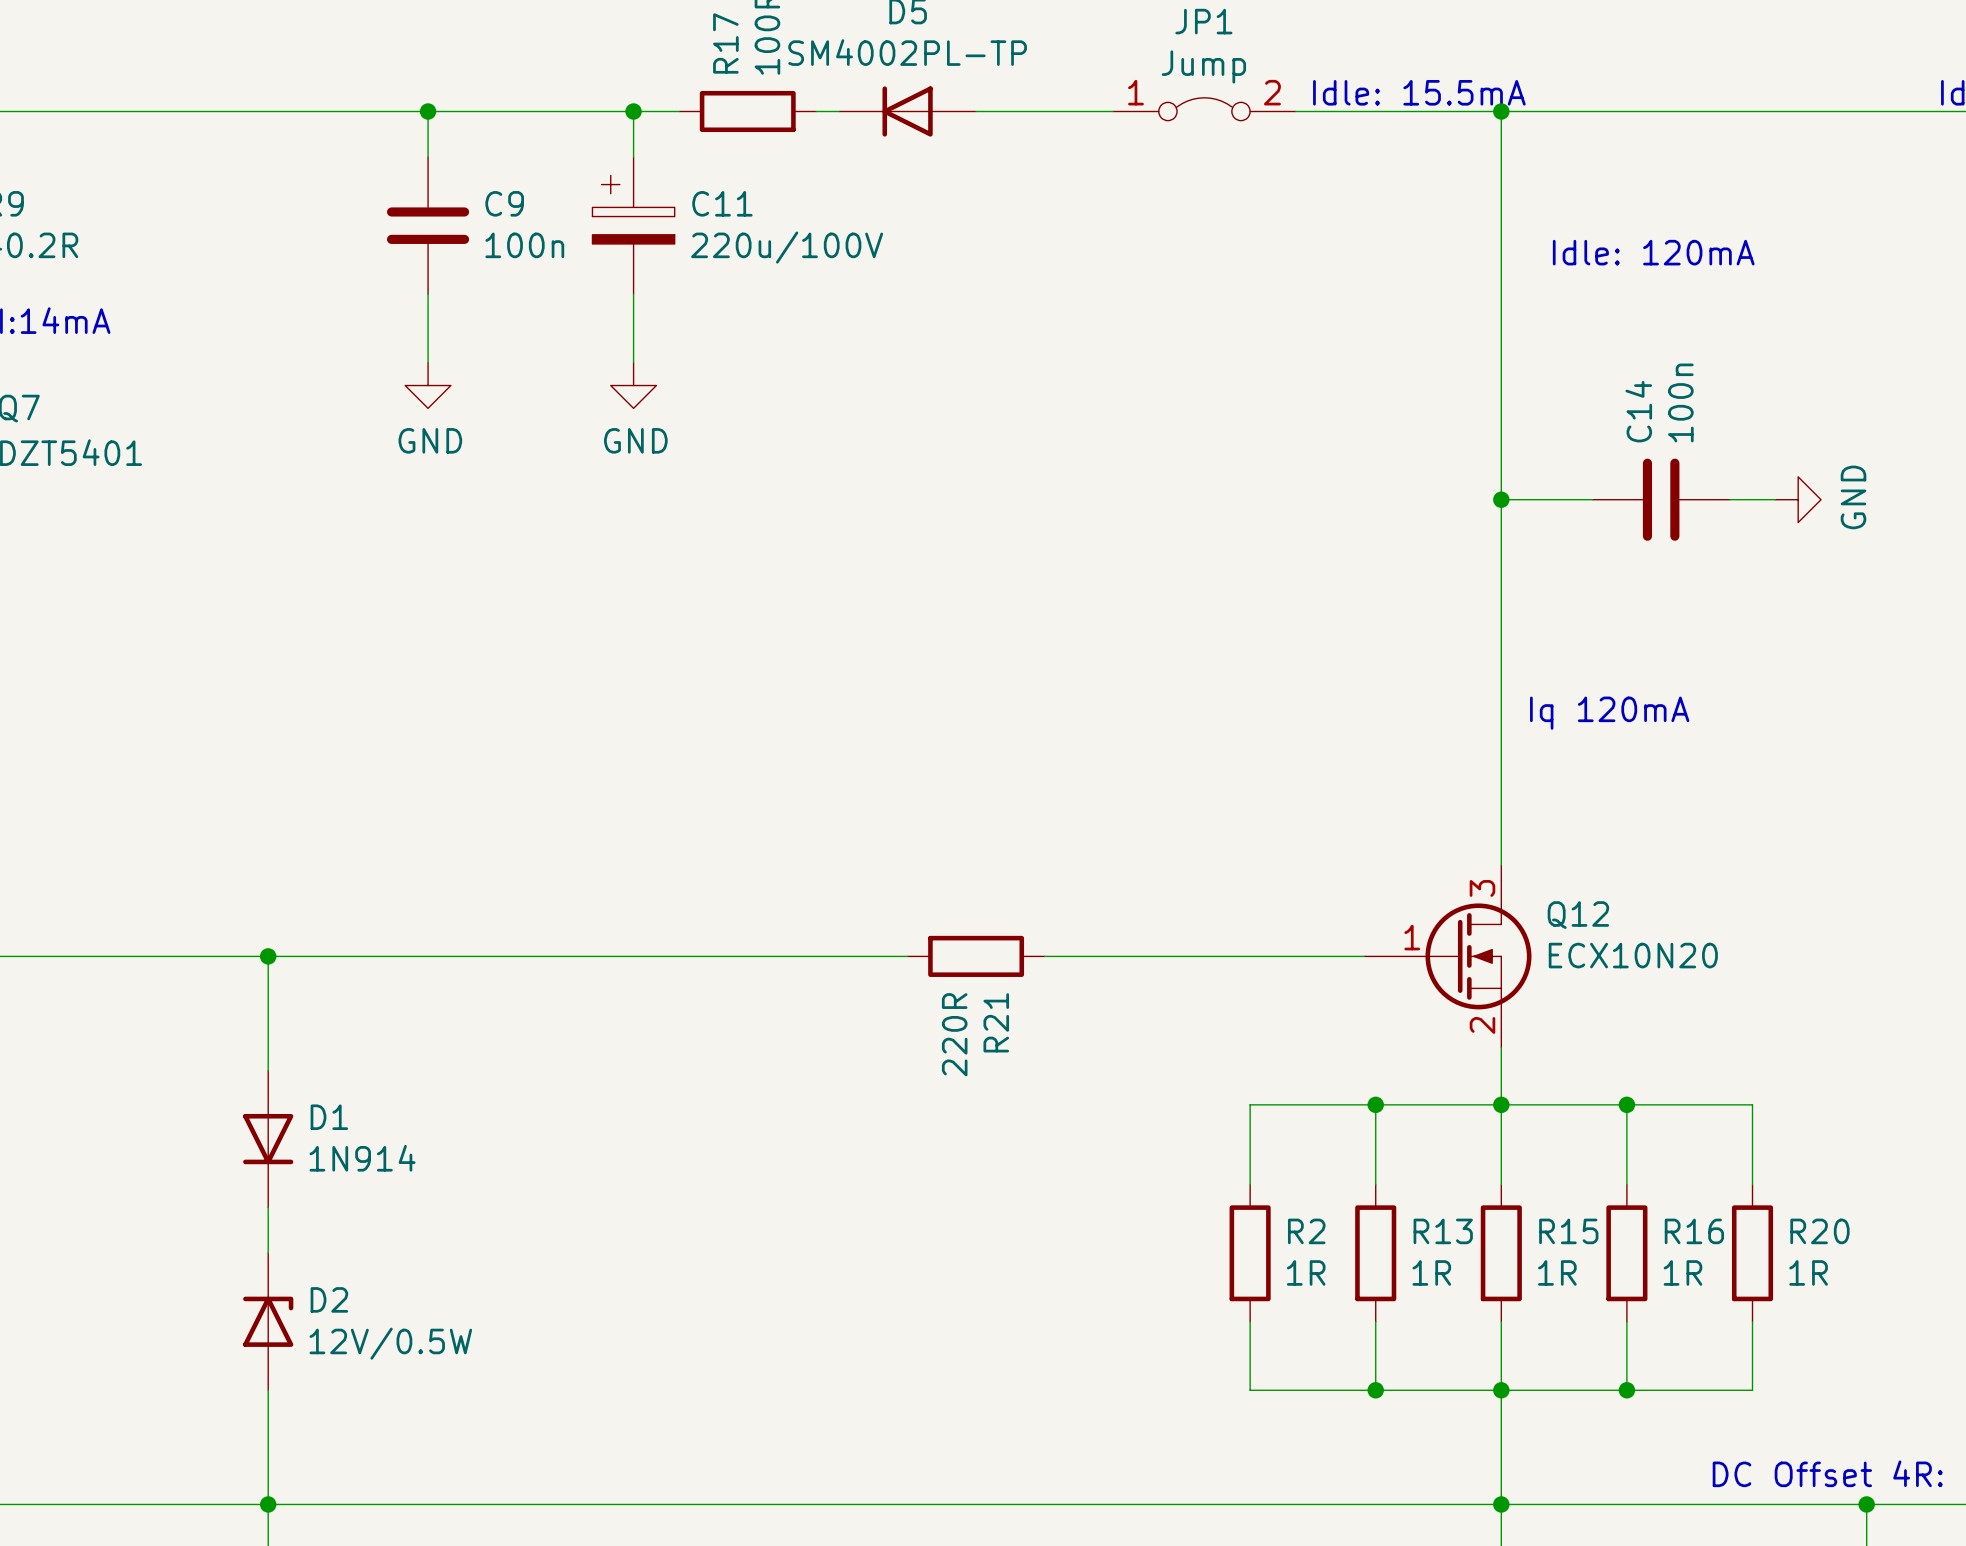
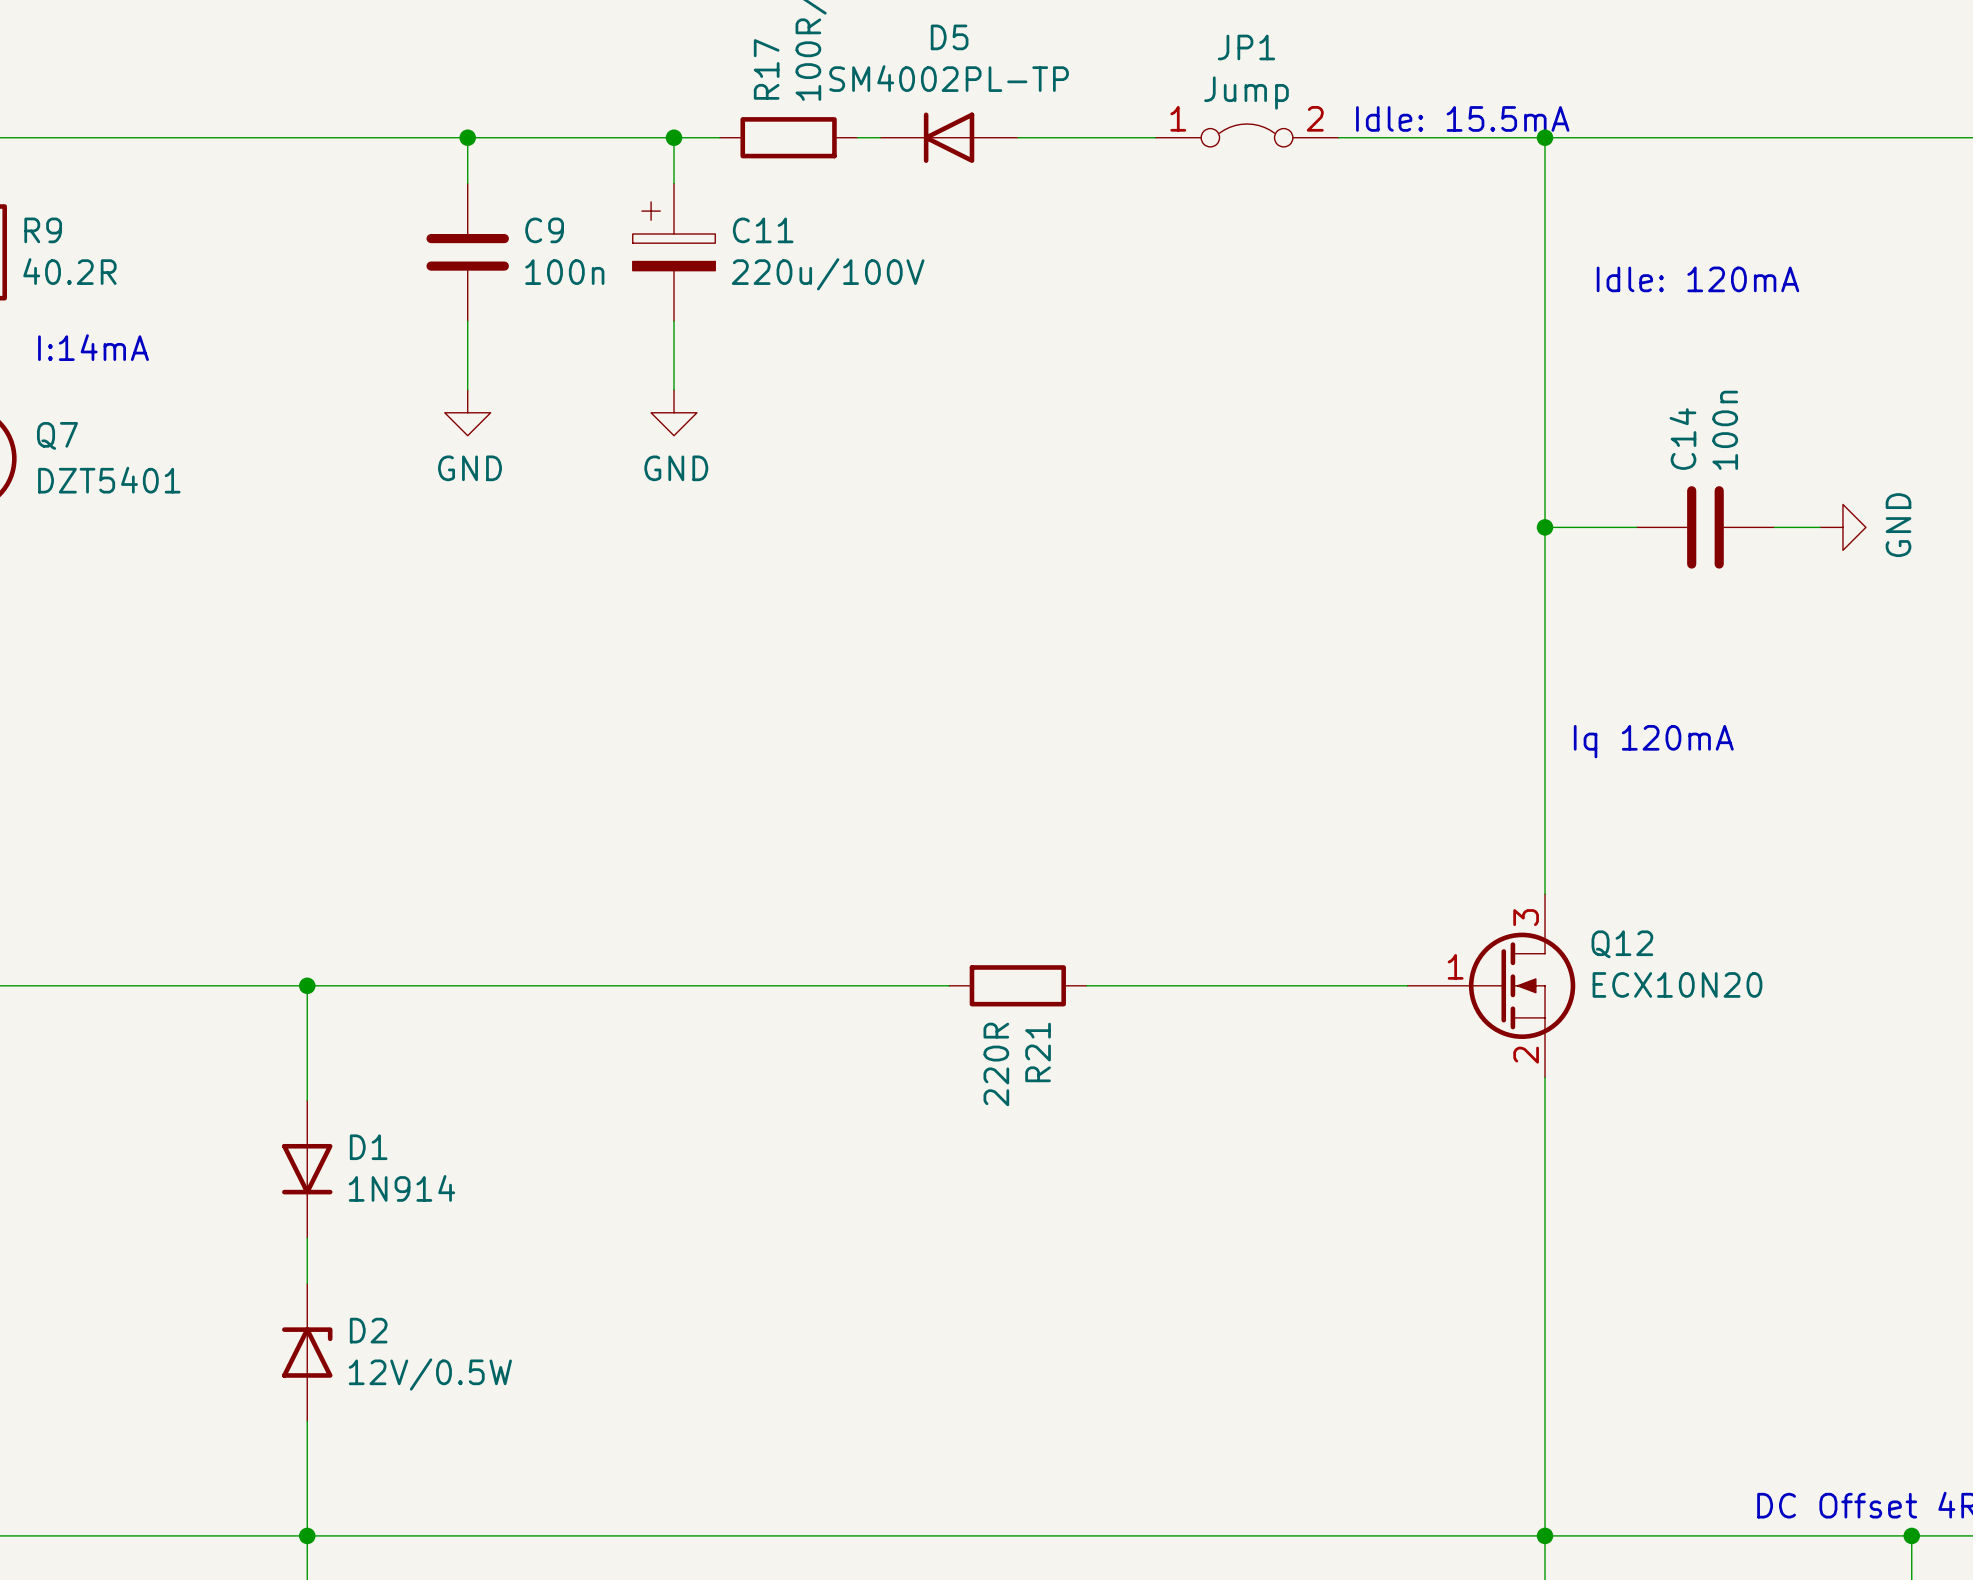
wire: (1375, 1104) (1375, 1184) -> none
junction: (1375, 1104) -> none
junction: (1501, 1104) -> none
wire: (1626, 1104) (1626, 1184) -> none
junction: (1626, 1104) -> none
wire: (1250, 1184) (1250, 1104) (1752, 1104) (1752, 1184) -> none
wire: none -> (1545, 1215) (1545, 1352)
R2: 1R (1250, 1253) -> none
R13: 1R (1375, 1253) -> none
R15: 1R (1501, 1253) -> none
R16: 1R (1626, 1253) -> none
R20: 1R (1752, 1253) -> none
wire: (1250, 1321) (1250, 1390) (1752, 1390) (1752, 1321) -> none
wire: (1375, 1321) (1375, 1390) -> none
wire: (1626, 1321) (1626, 1390) -> none
junction: (1375, 1390) -> none
junction: (1501, 1390) -> none
junction: (1626, 1390) -> none

